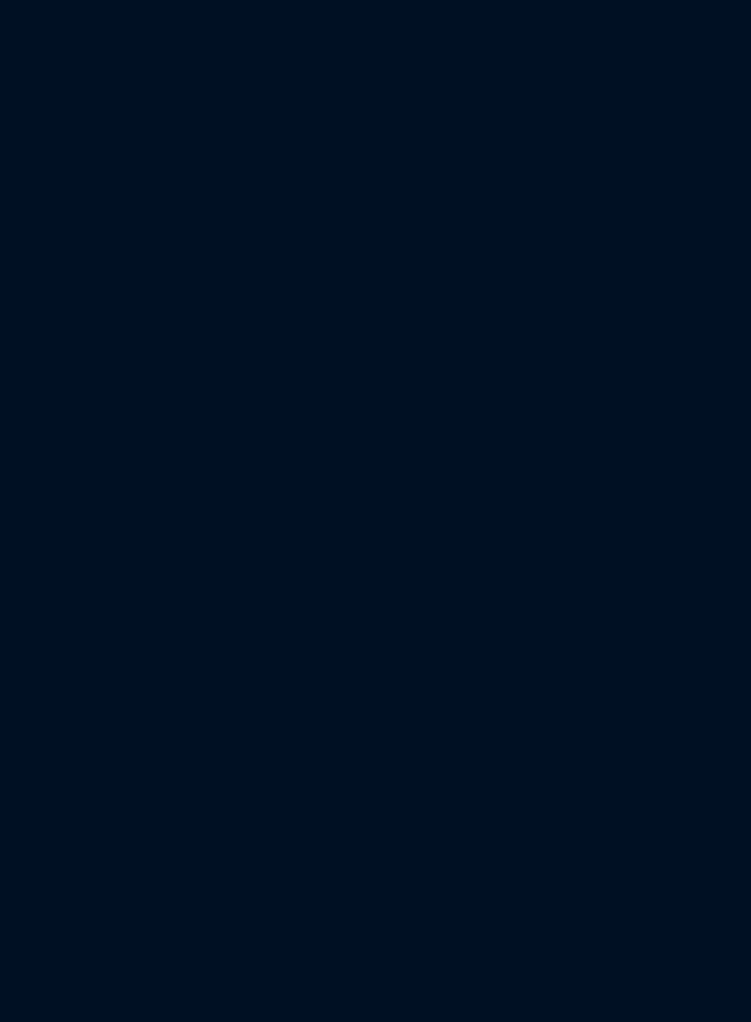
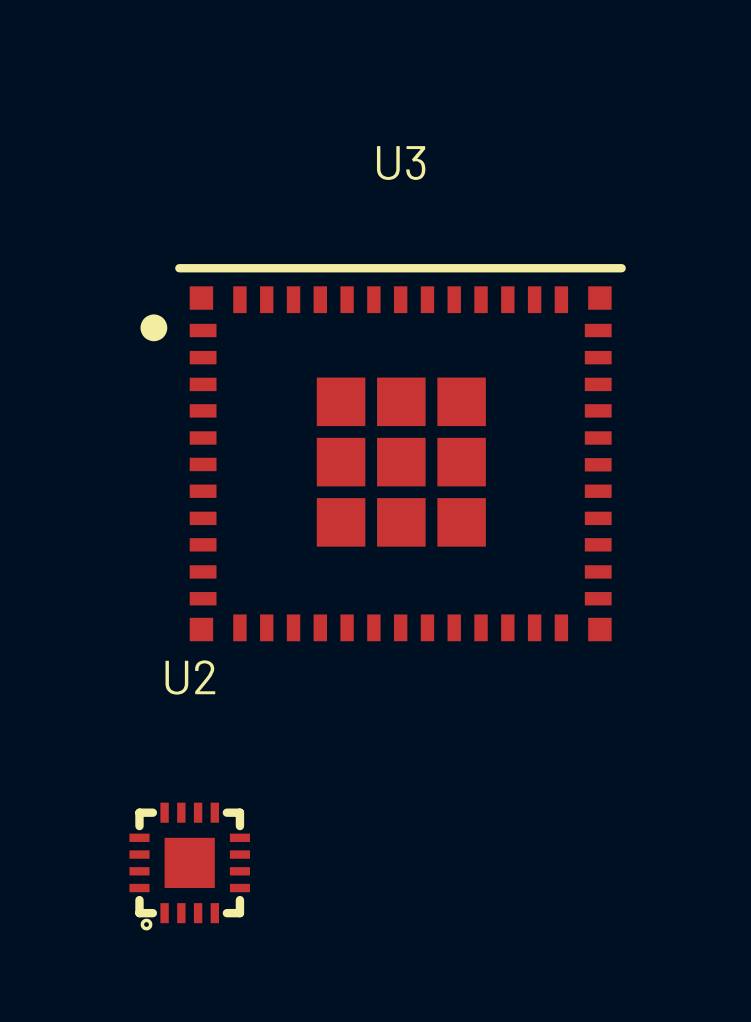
U3: none -> (383, 452)
U2: none -> (189, 866)

